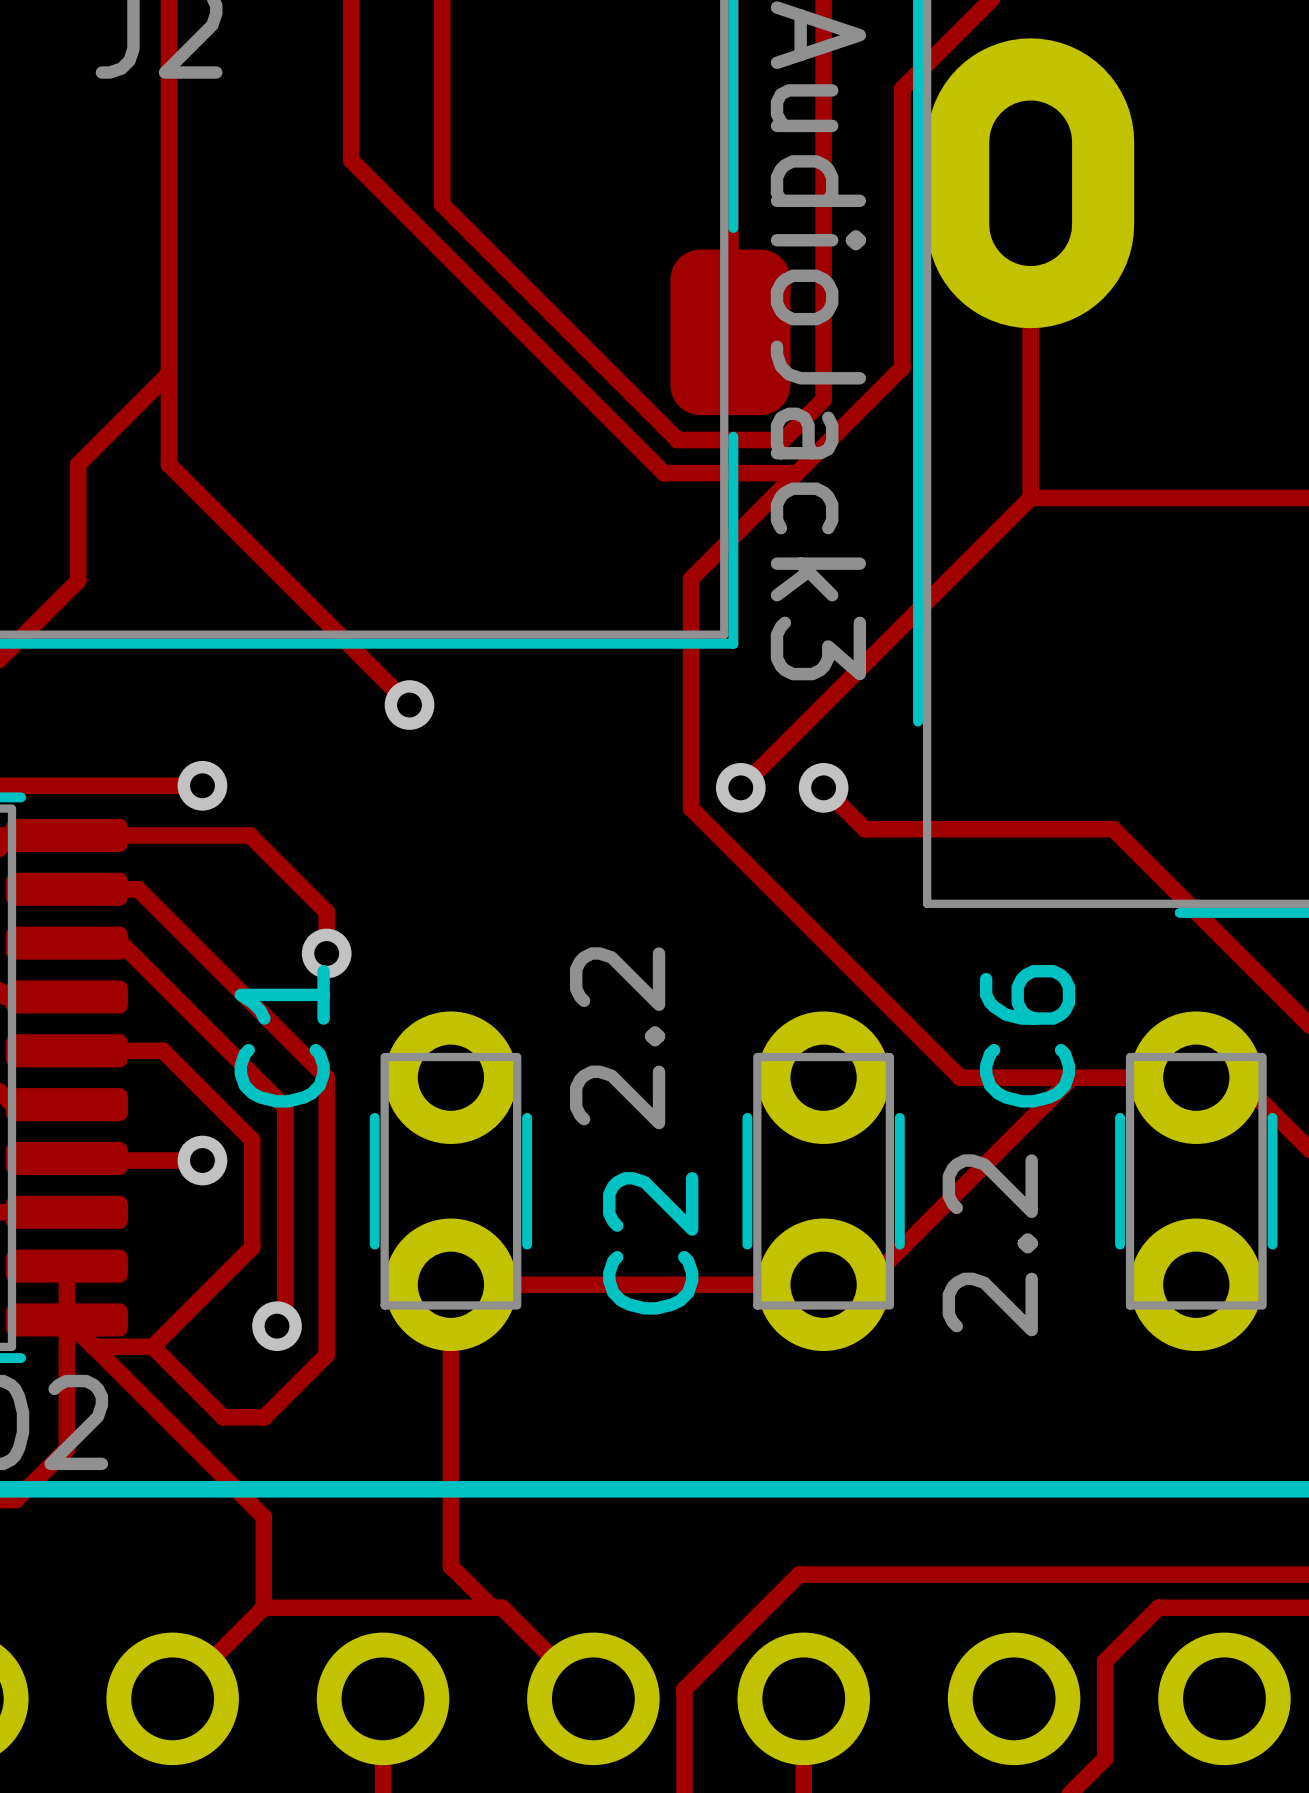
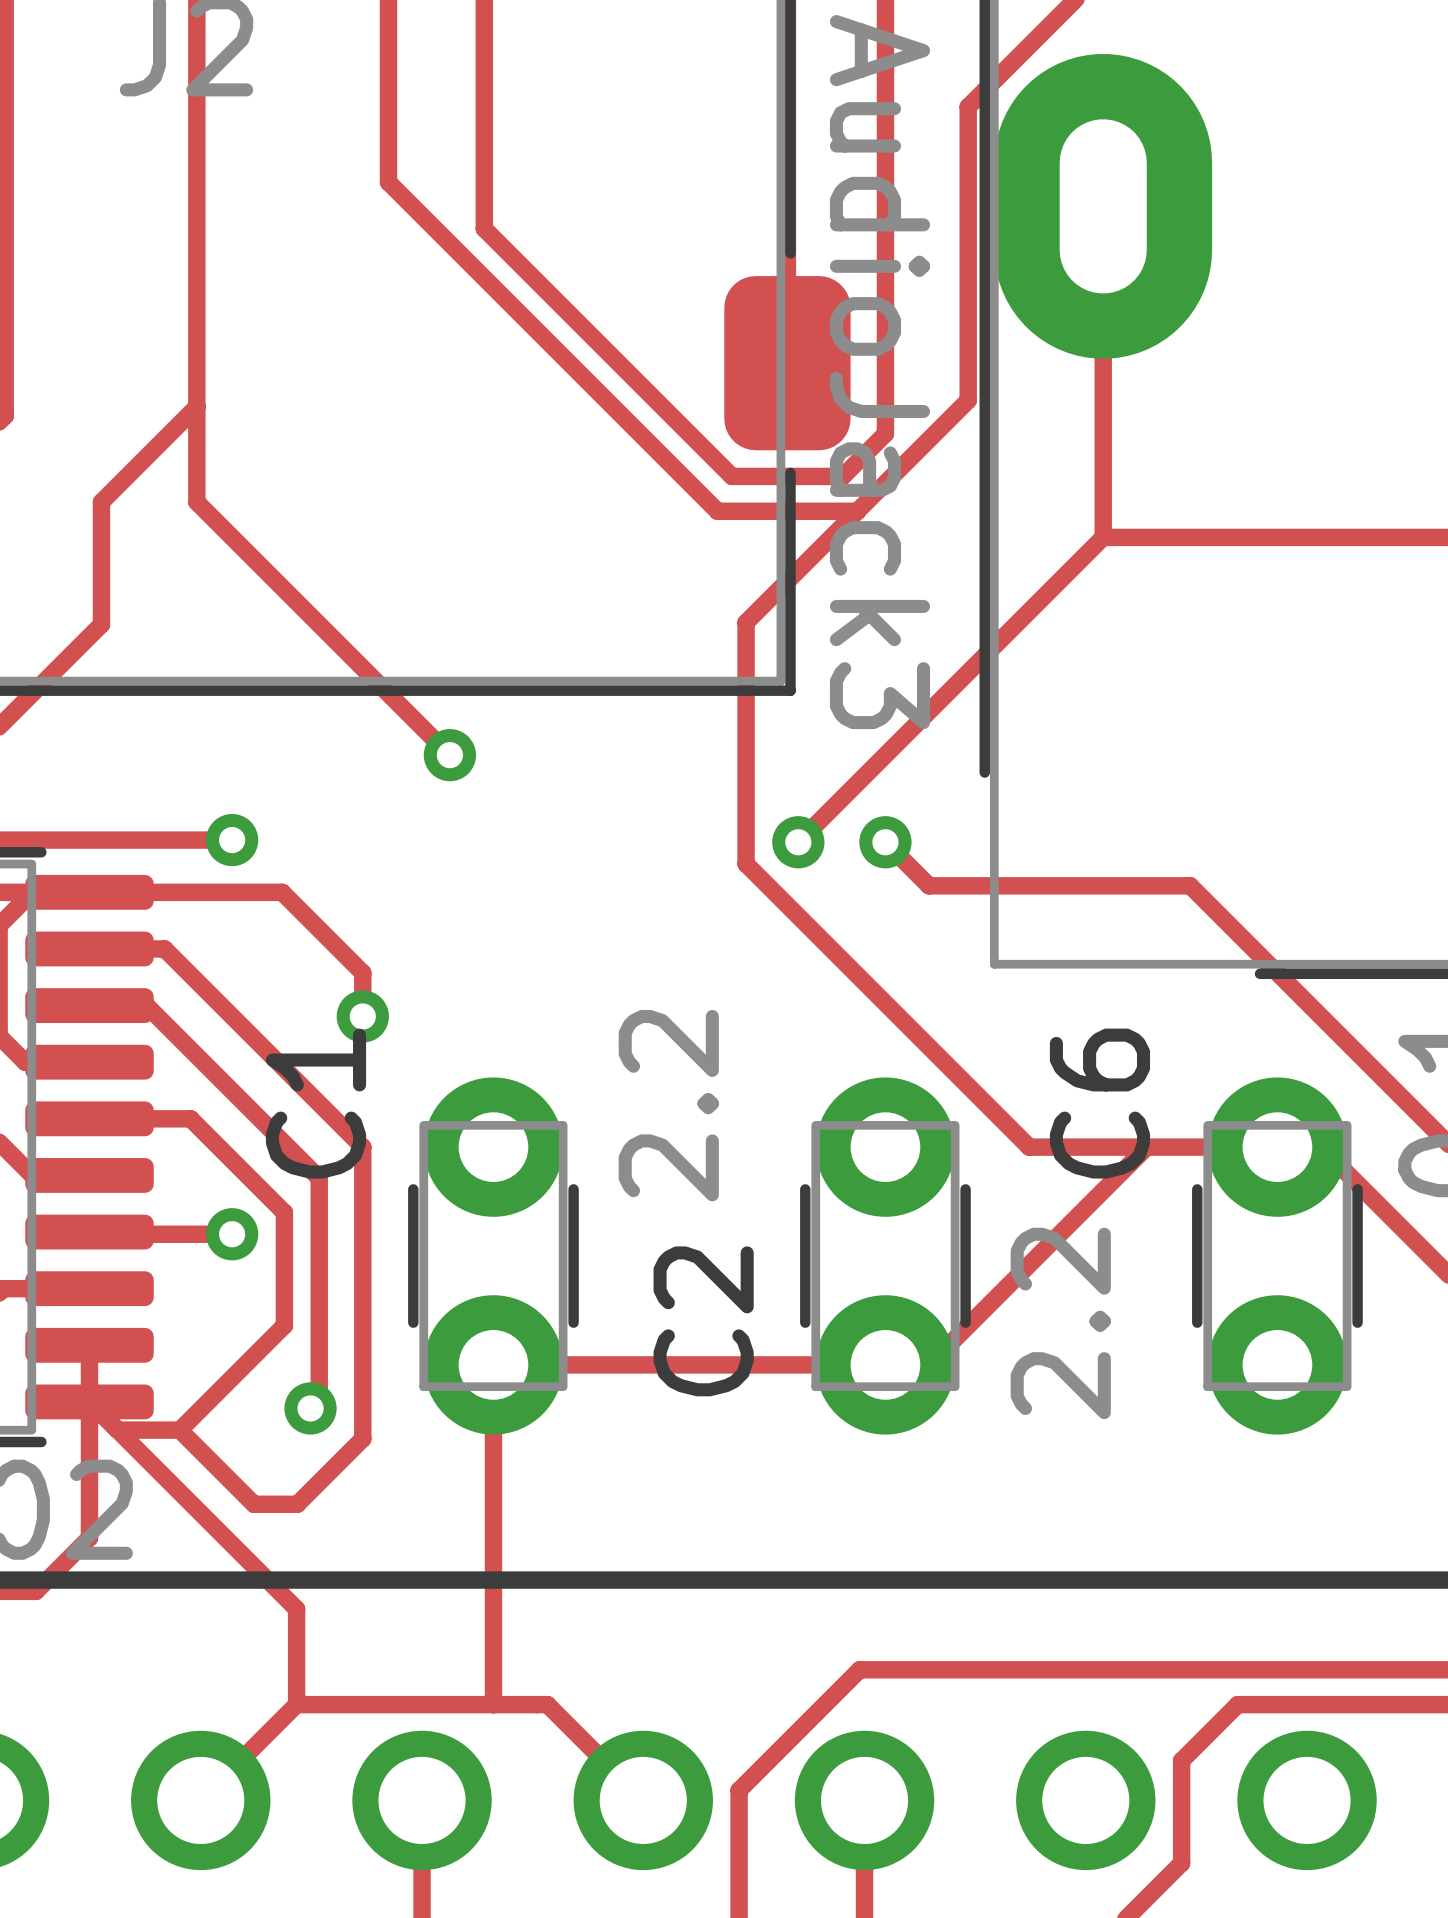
track: (450, 1566) (492, 1607) -> (493, 1661) (493, 1704)

